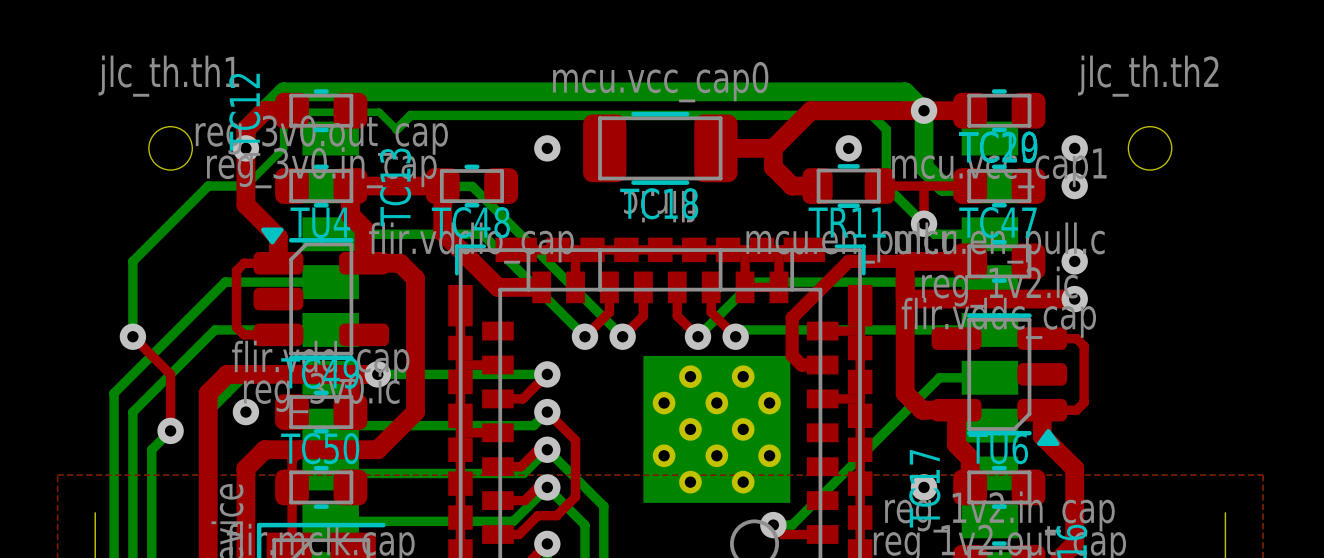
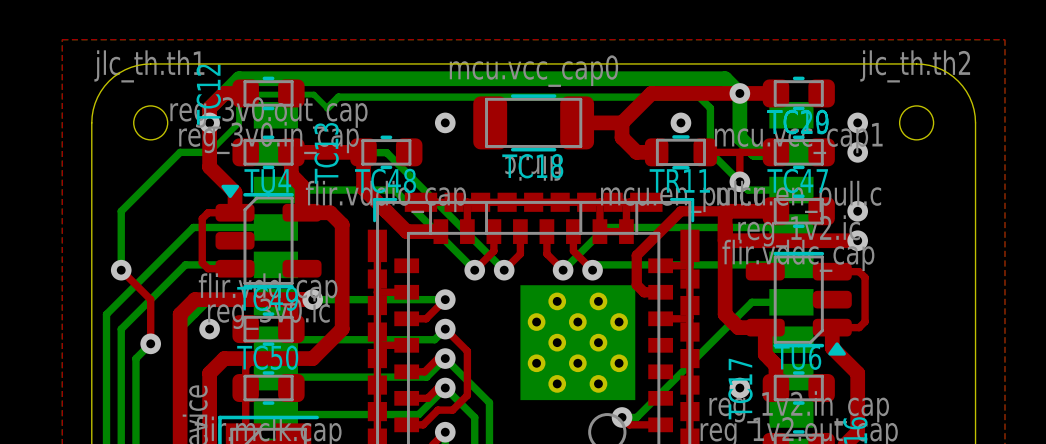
top zone outline: (57, 475) (1263, 475) -> (62, 378) (62, 39) (1004, 39) (1004, 378)
board edge: none -> (91, 407) (93, 109) (100, 91) (113, 76) (131, 67) (150, 63) (916, 63) (942, 69) (958, 81) (966, 91) (975, 116) (975, 407)

